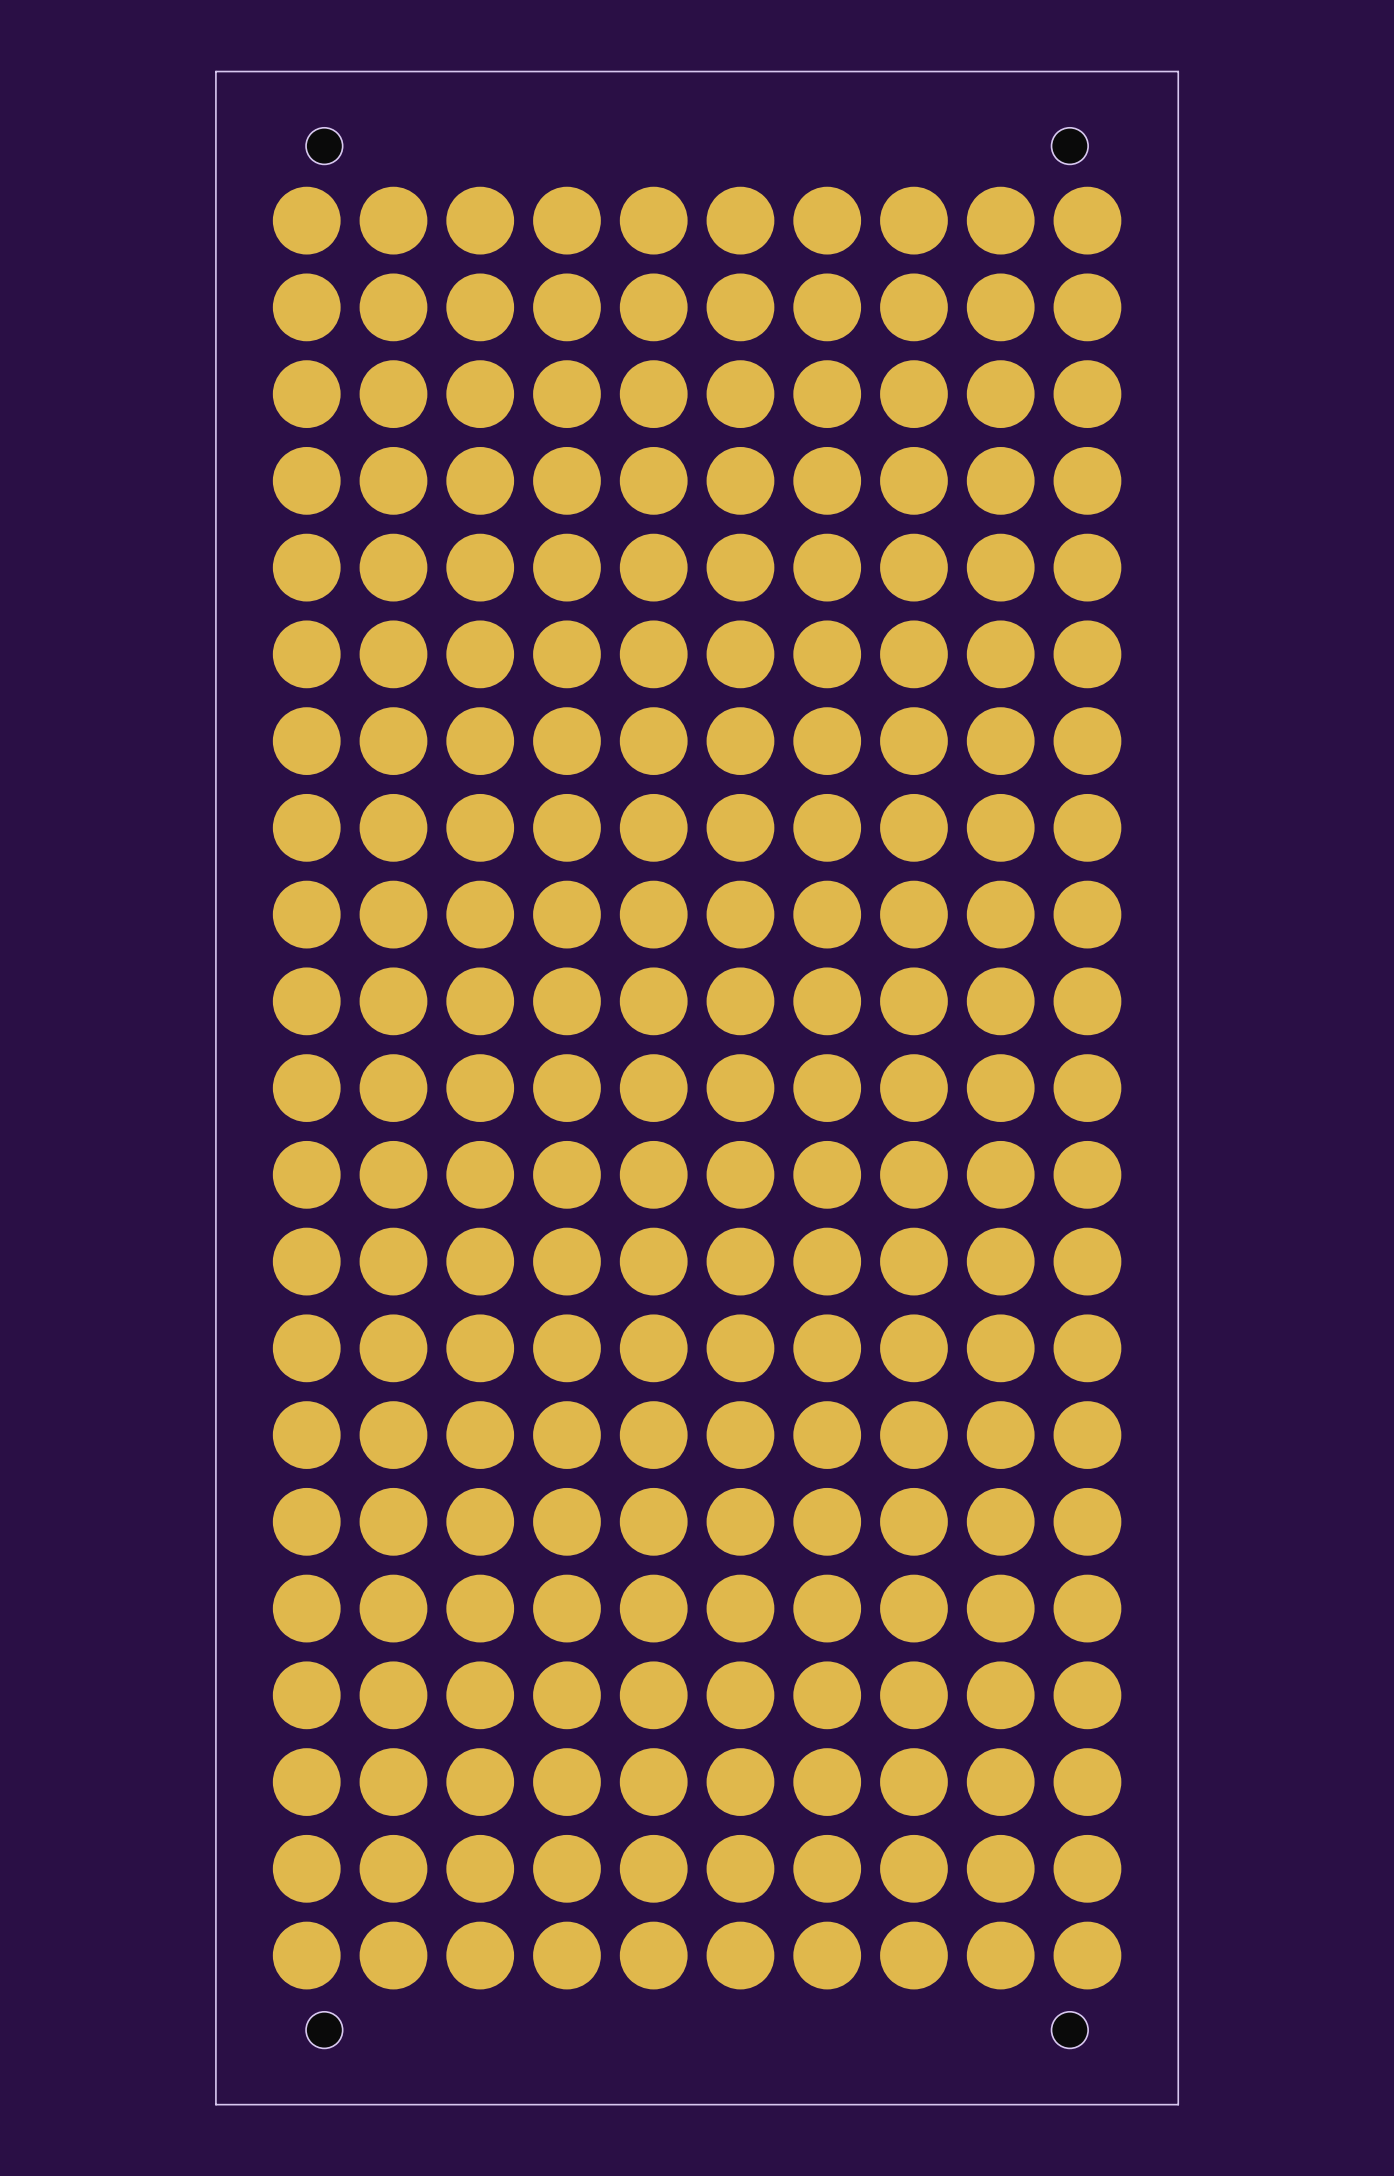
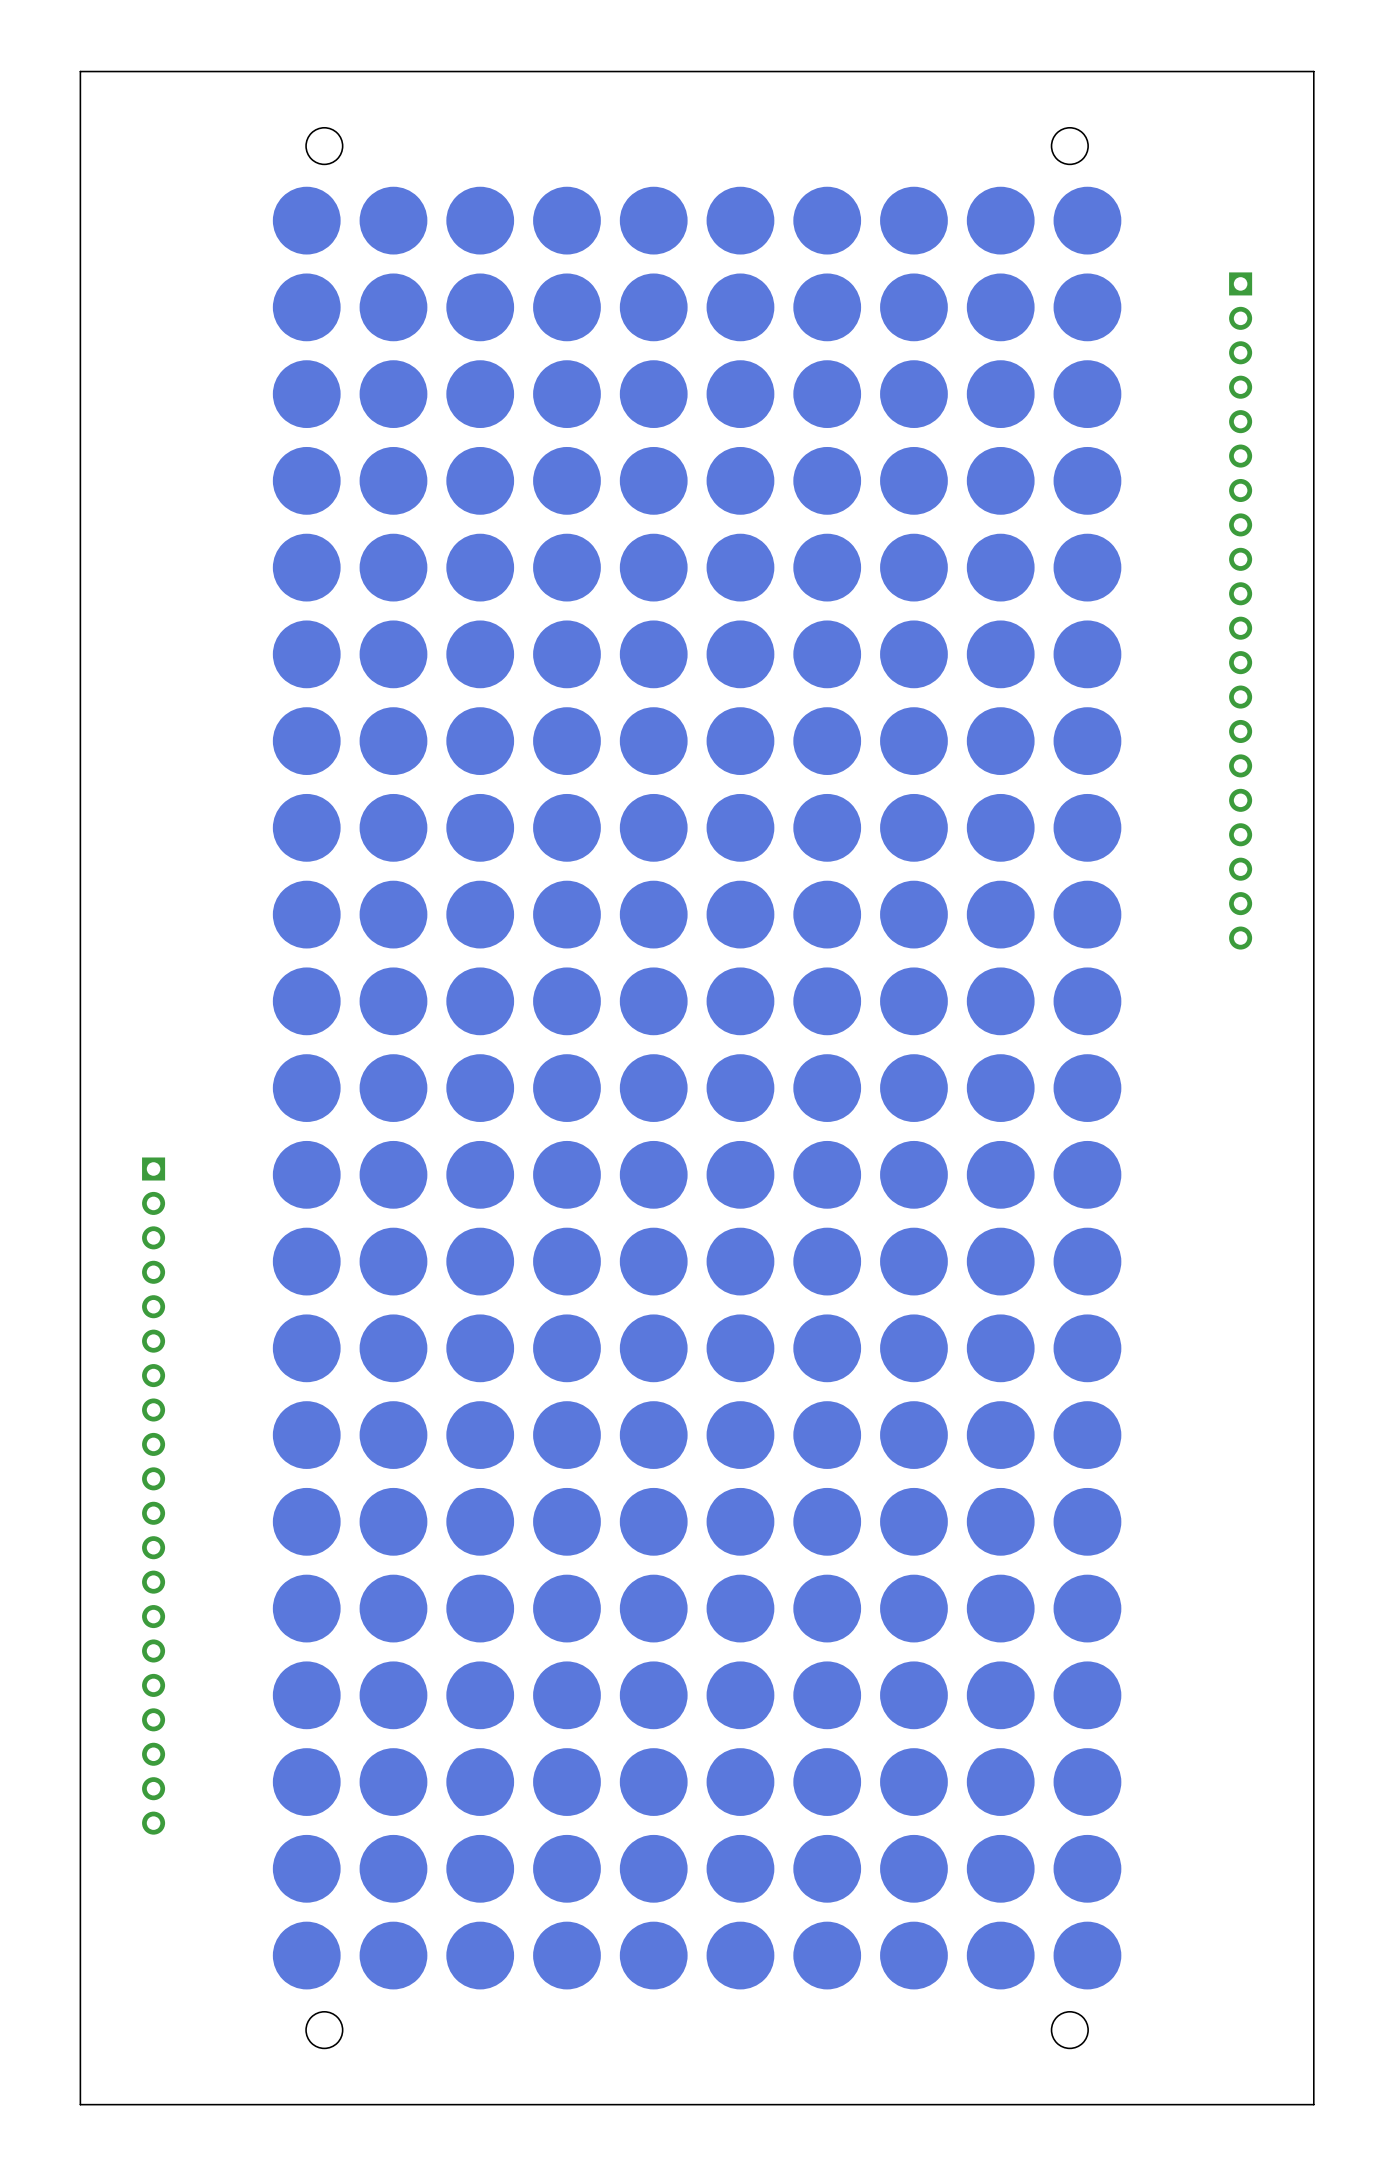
board edge: (215, 71) (215, 2104) -> (215, 71) (80, 71) (80, 2104) (215, 2104)
board edge: (1178, 71) (1178, 2104) -> (1178, 71) (1313, 71) (1313, 2104) (1178, 2104)
part: none -> (1240, 610)
part: none -> (153, 1496)

